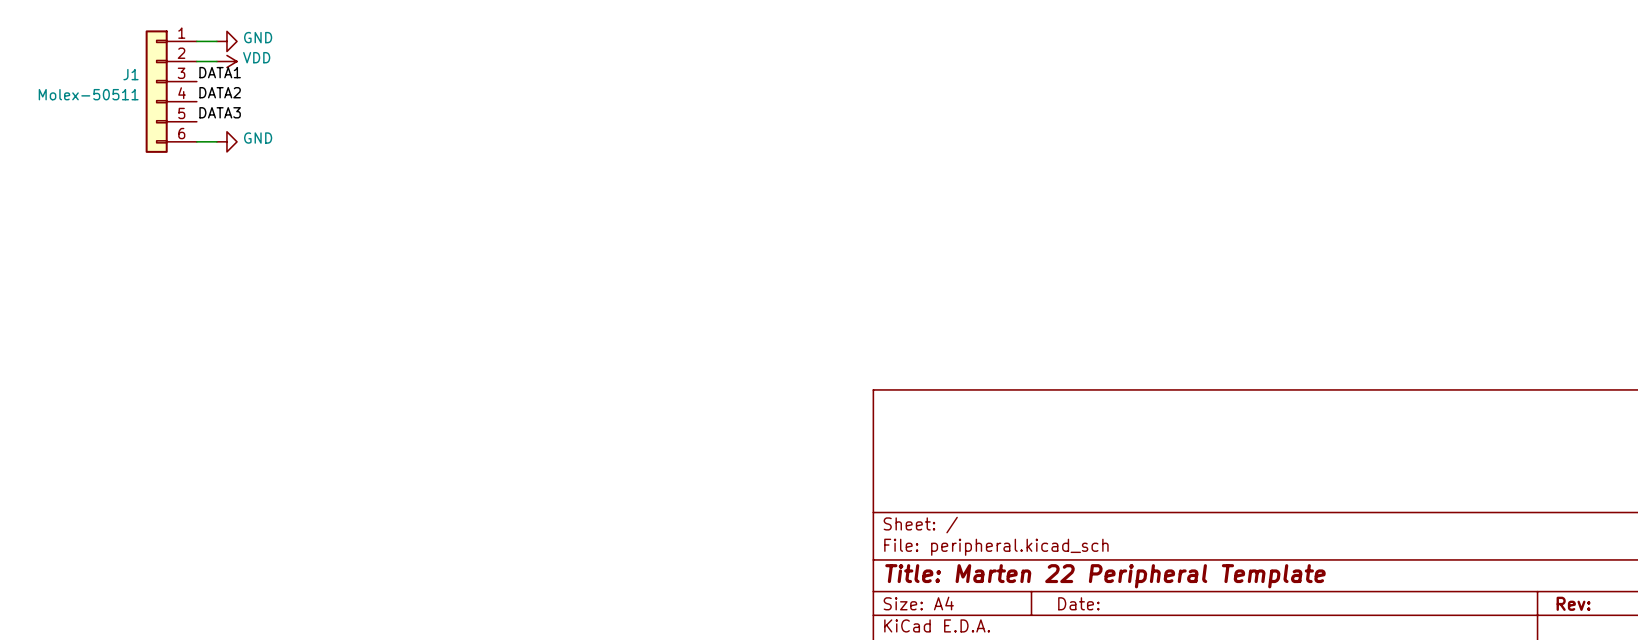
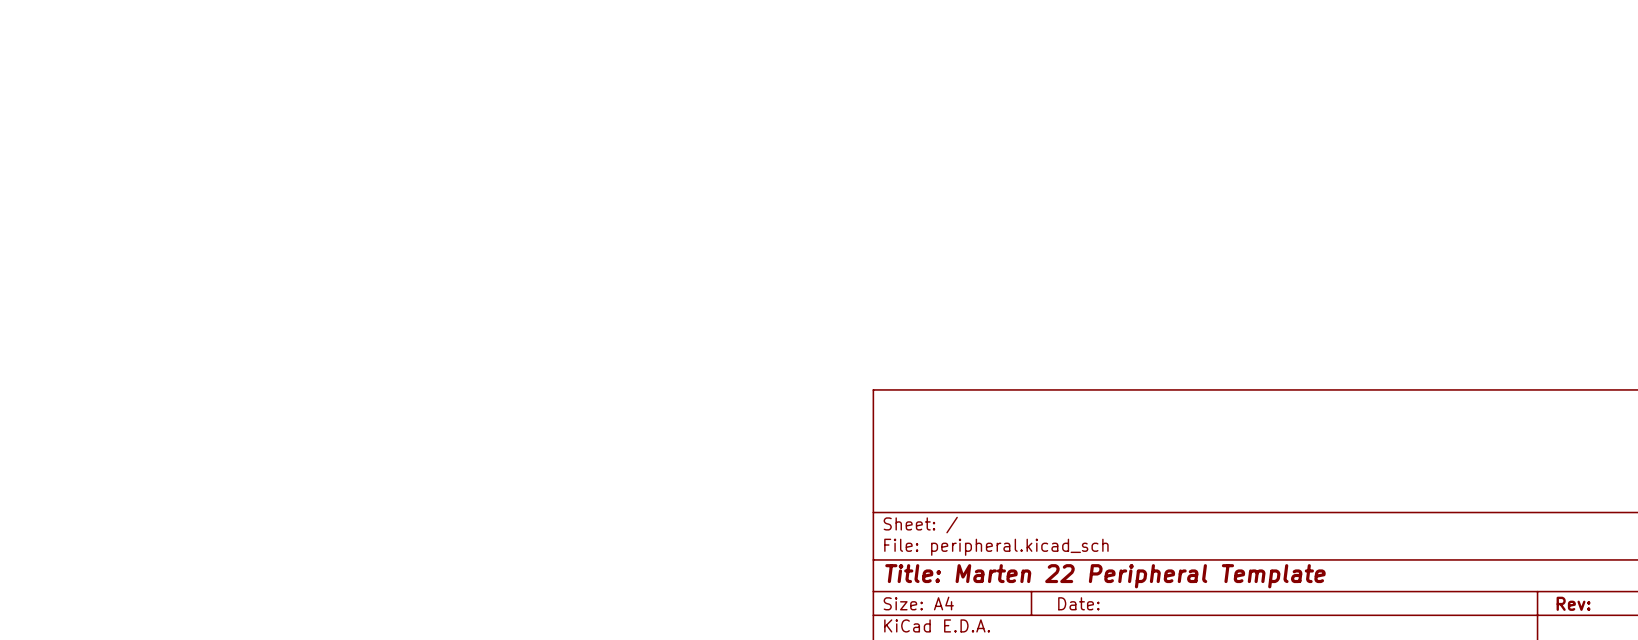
wire: (196, 41) (216, 41) -> none
power symbol: GND (226, 41) -> none
wire: (196, 61) (216, 61) -> none
power symbol: VDD (226, 61) -> none
label: DATA1 (220, 72) -> none
J1: Molex-50511 (171, 91) -> none
label: DATA2 (220, 92) -> none
label: DATA3 (220, 112) -> none
wire: (196, 141) (216, 141) -> none
power symbol: GND (226, 141) -> none

